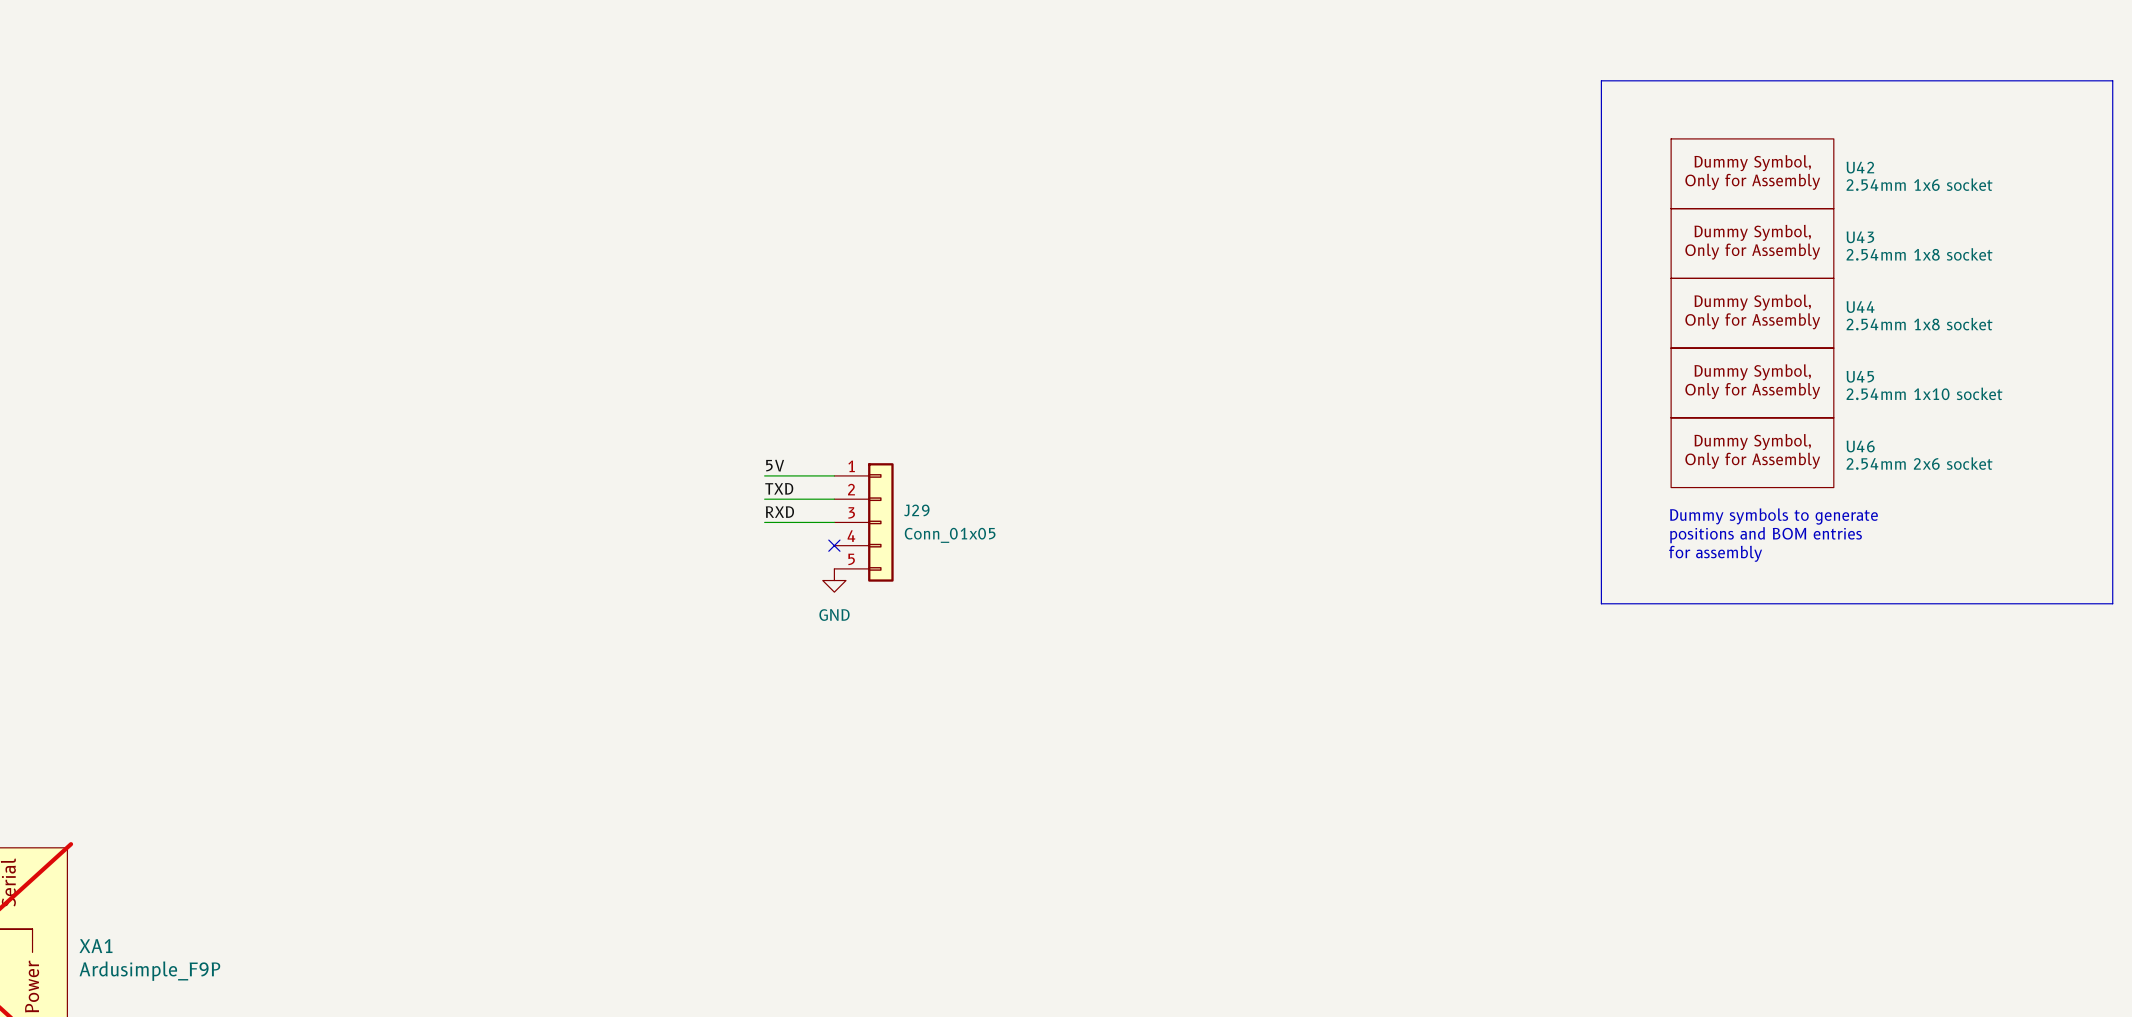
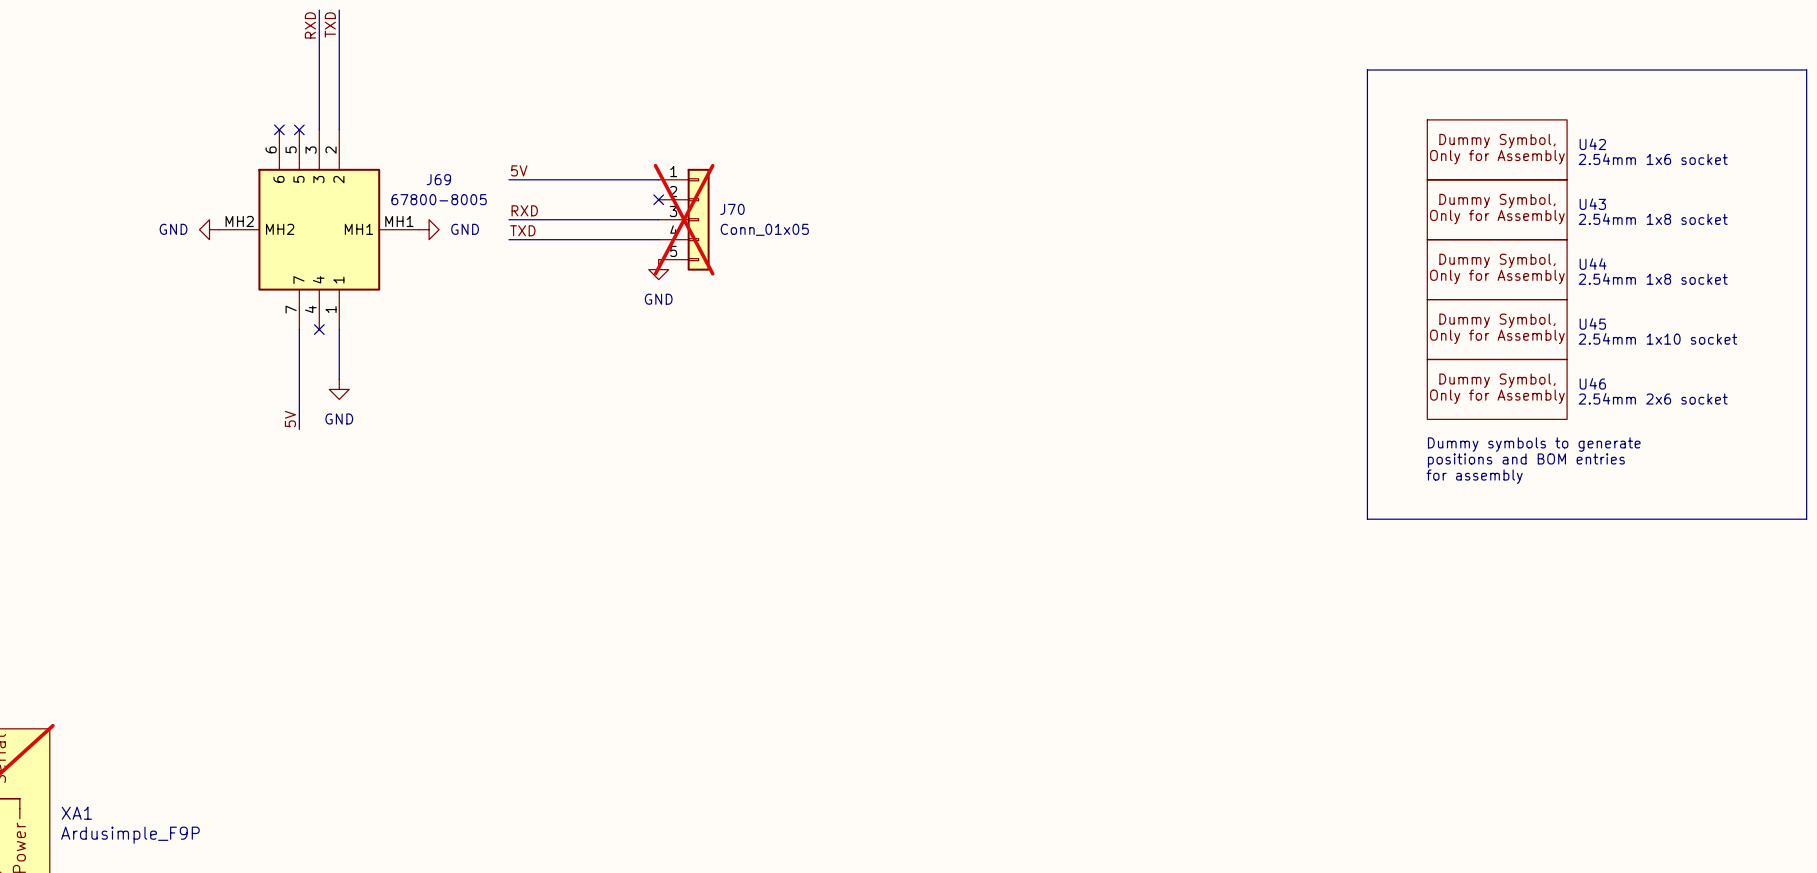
wire: none -> (319, 10) (319, 129)
wire: none -> (339, 10) (339, 129)
label: none -> RXD (310, 25)
label: none -> TXD (330, 24)
no-connect mark: none -> (279, 129)
no-connect mark: none -> (299, 129)
label: none -> 5V (519, 170)
wire: none -> (508, 179) (658, 179)
no-connect mark: none -> (658, 199)
label: none -> RXD (524, 210)
wire: none -> (508, 219) (658, 219)
J70: none -> Conn_01x05 (684, 219)
power symbol: none -> GND (209, 229)
J69: none -> 67800-8005 (319, 229)
power symbol: none -> GND (429, 229)
label: none -> TXD (522, 230)
wire: none -> (508, 239) (658, 239)
power symbol: none -> GND (658, 269)
wire: none -> (299, 329) (299, 429)
no-connect mark: none -> (319, 329)
wire: none -> (339, 329) (339, 379)
power symbol: none -> GND (339, 389)
label: 5V (775, 465) -> none
wire: (764, 475) (834, 475) -> none
label: none -> 5V (290, 419)
label: TXD (779, 488) -> none
wire: (764, 499) (834, 499) -> none
label: RXD (779, 512) -> none
wire: (764, 522) (834, 522) -> none
J29: Conn_01x05 (864, 522) -> none
no-connect mark: (834, 545) -> none
power symbol: GND (834, 580) -> none

